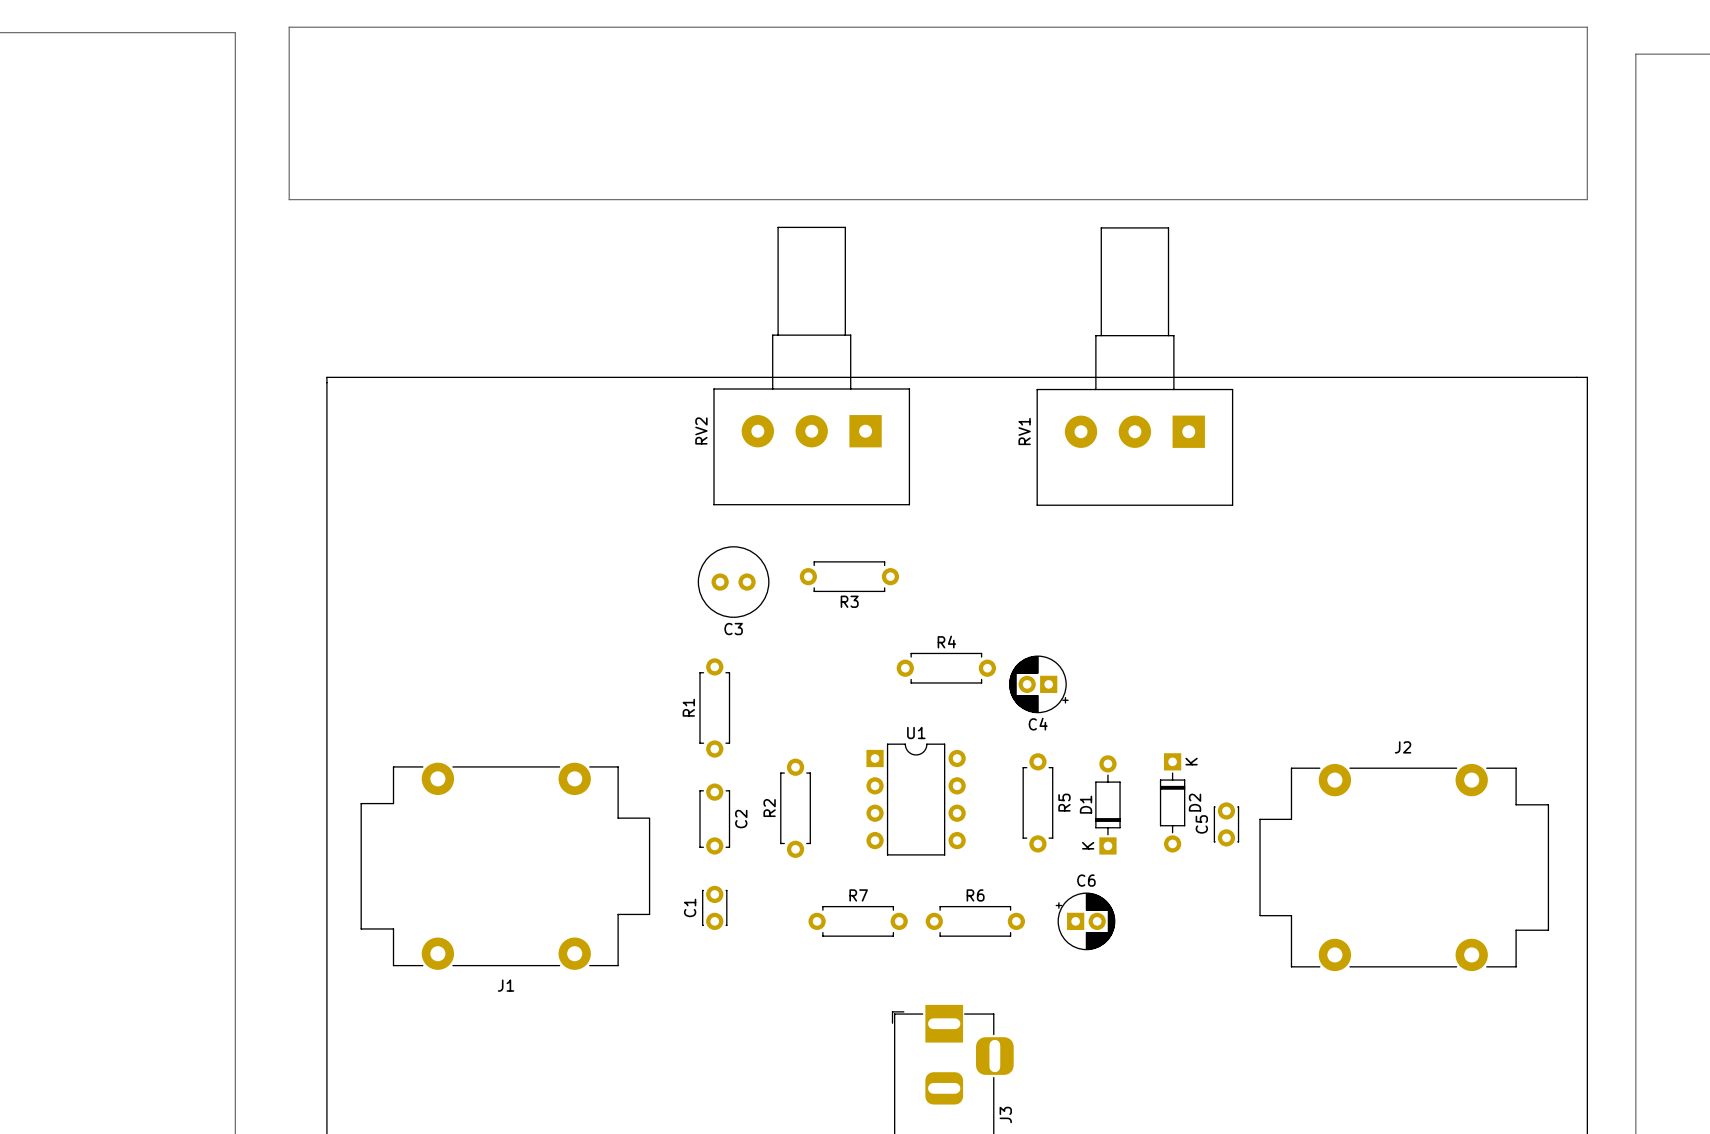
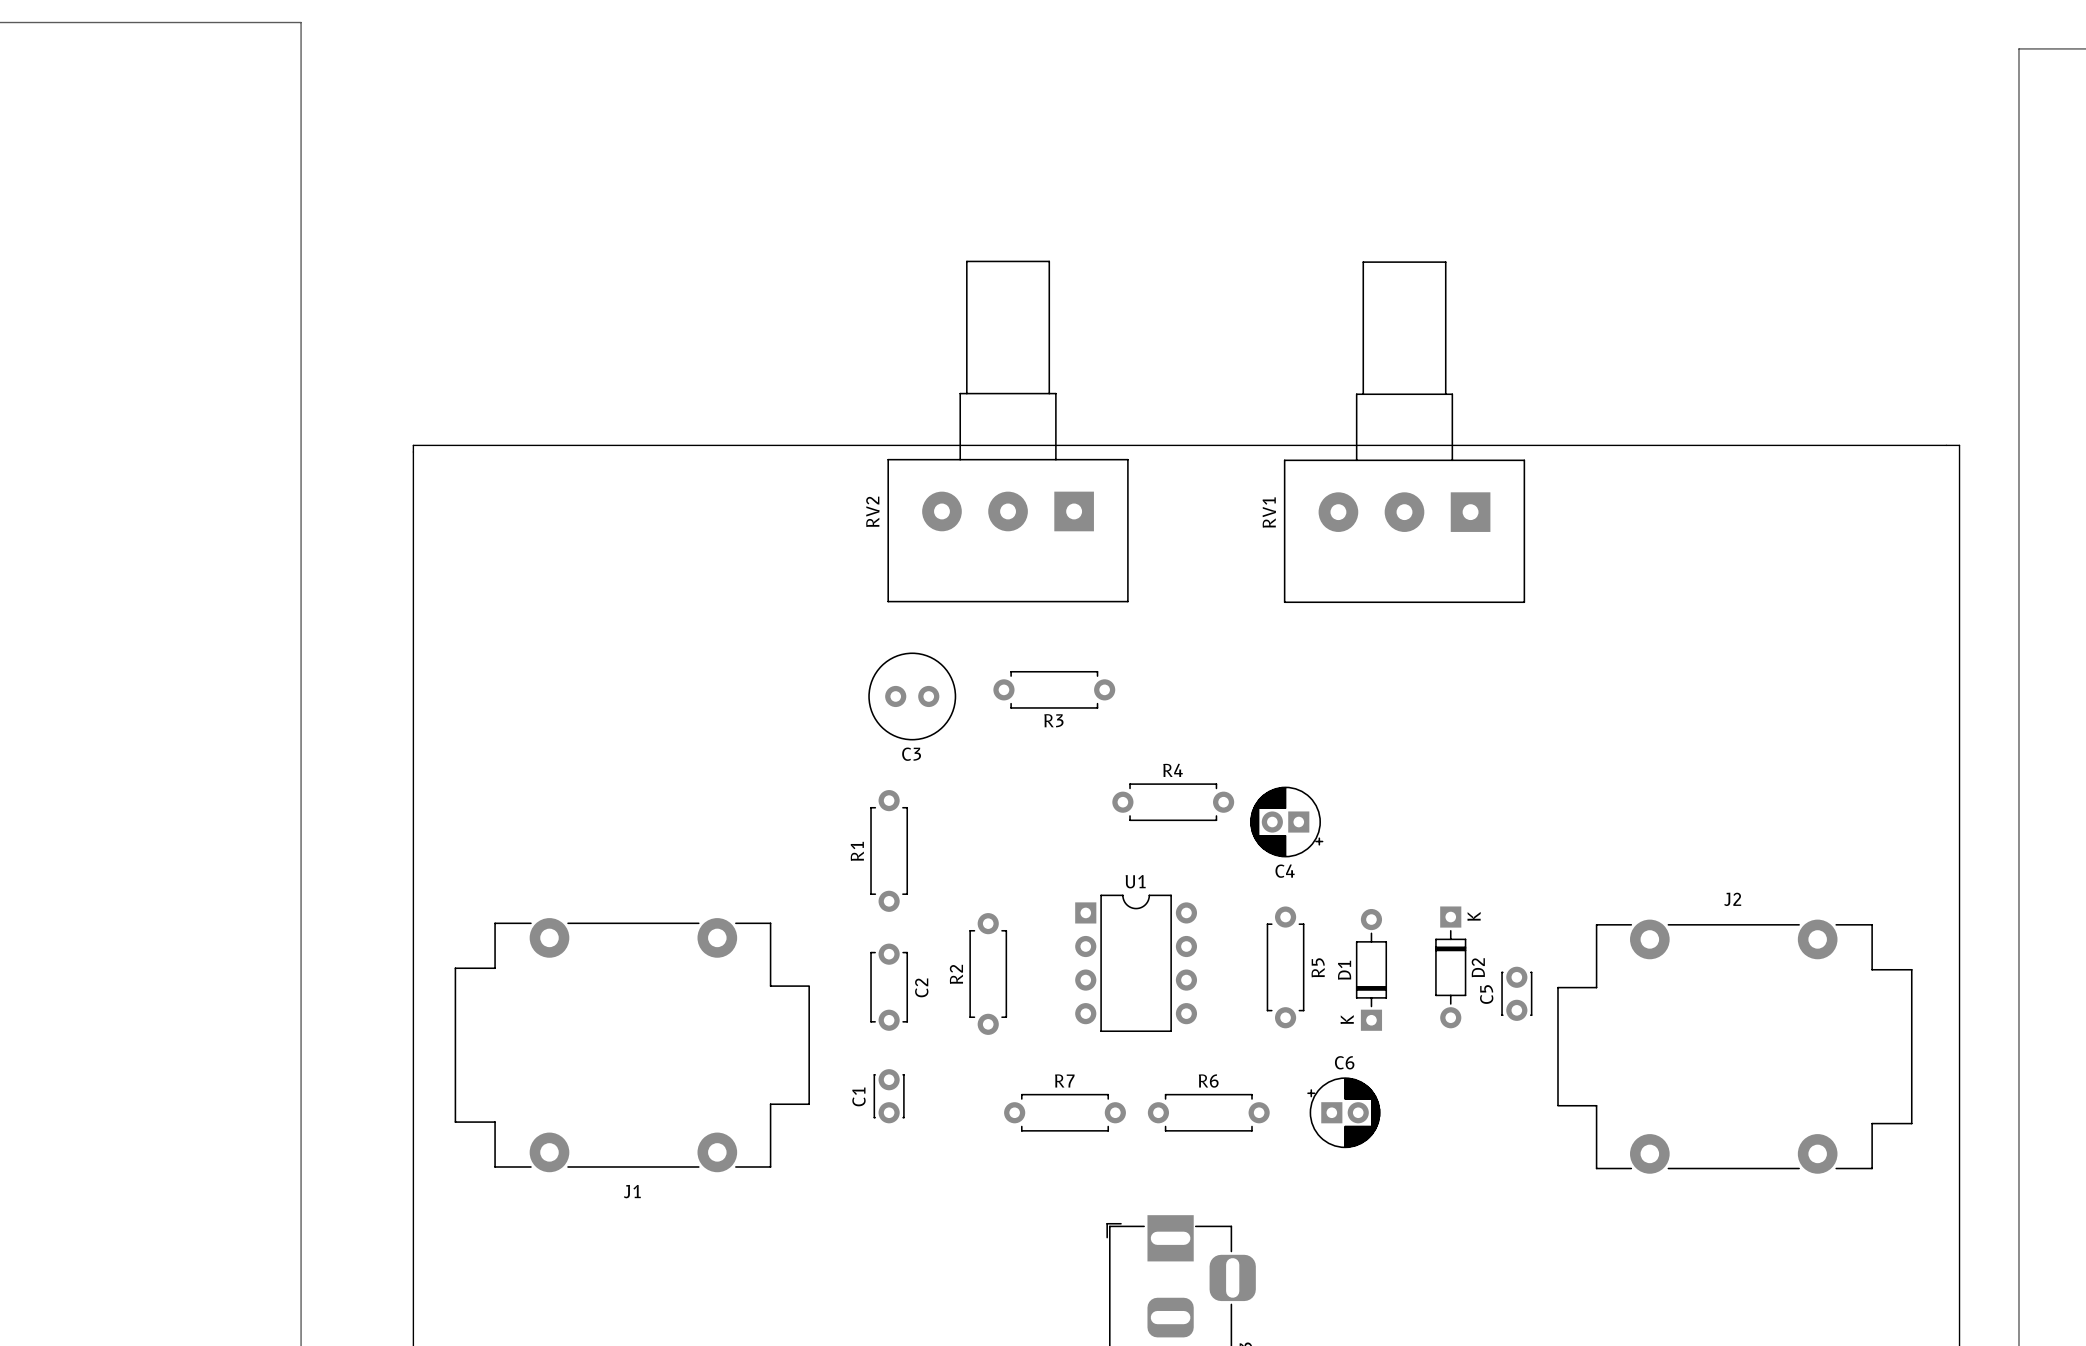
line: (289, 27) (1587, 27) (1587, 199) (289, 199) (289, 27) -> none

